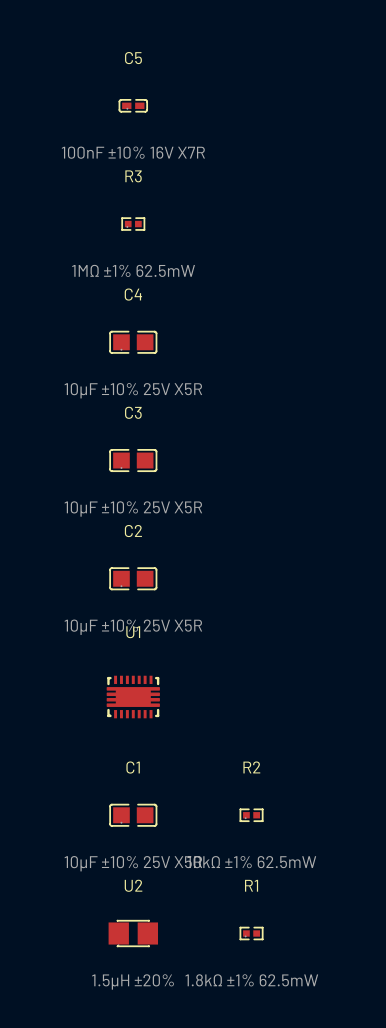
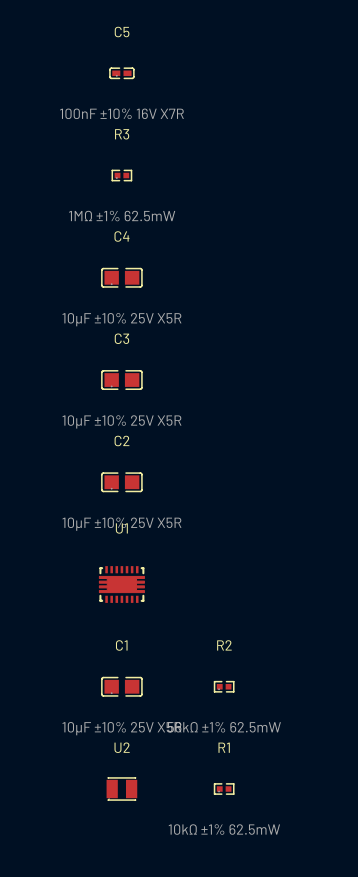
R2 value: 10kΩ ±1% 62.5mW (251, 862) -> 56kΩ ±1% 62.5mW (224, 727)
U2 footprint: [108, 919, 159, 948] -> [106, 777, 138, 801]
R1 value: 1.8kΩ ±1% 62.5mW (251, 980) -> 10kΩ ±1% 62.5mW (224, 829)
U2 value: 1.5µH ±20% (133, 981) -> none

